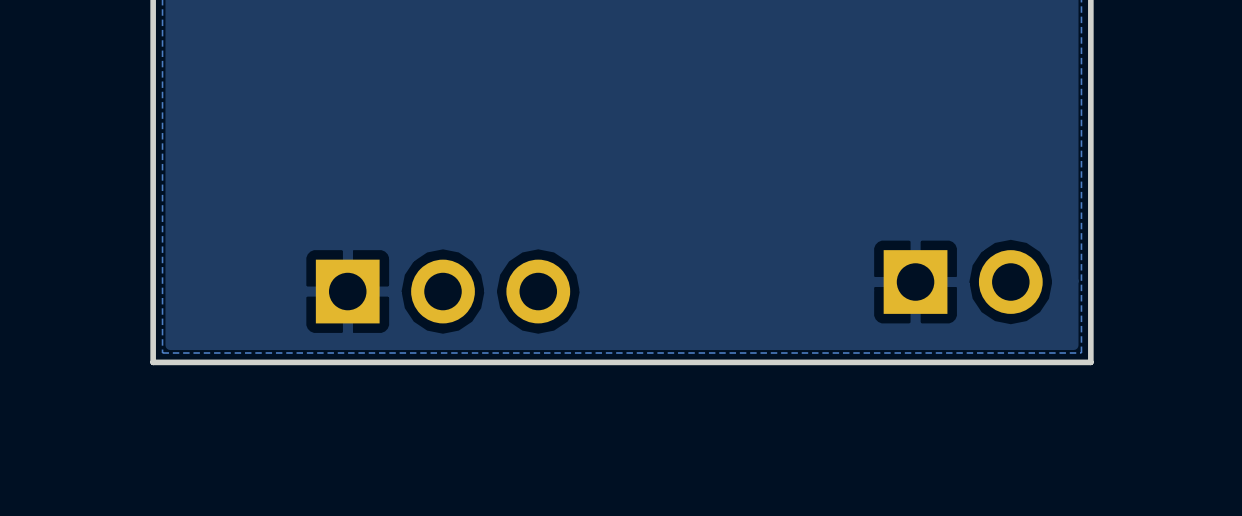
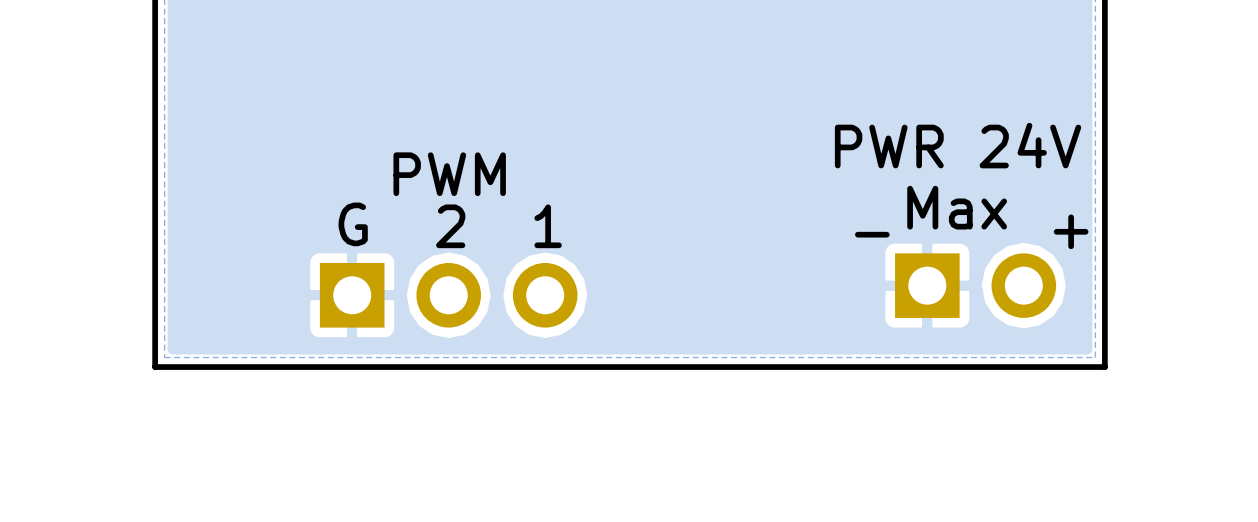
text: none -> PWR 24V (958, 145)
text: none -> PWM (449, 174)
text: none -> Max (957, 207)
text: none -> G (353, 224)
text: none -> 2 (450, 226)
text: none -> 1 (548, 226)
text: none -> + (1071, 231)
text: none -> - (872, 234)

